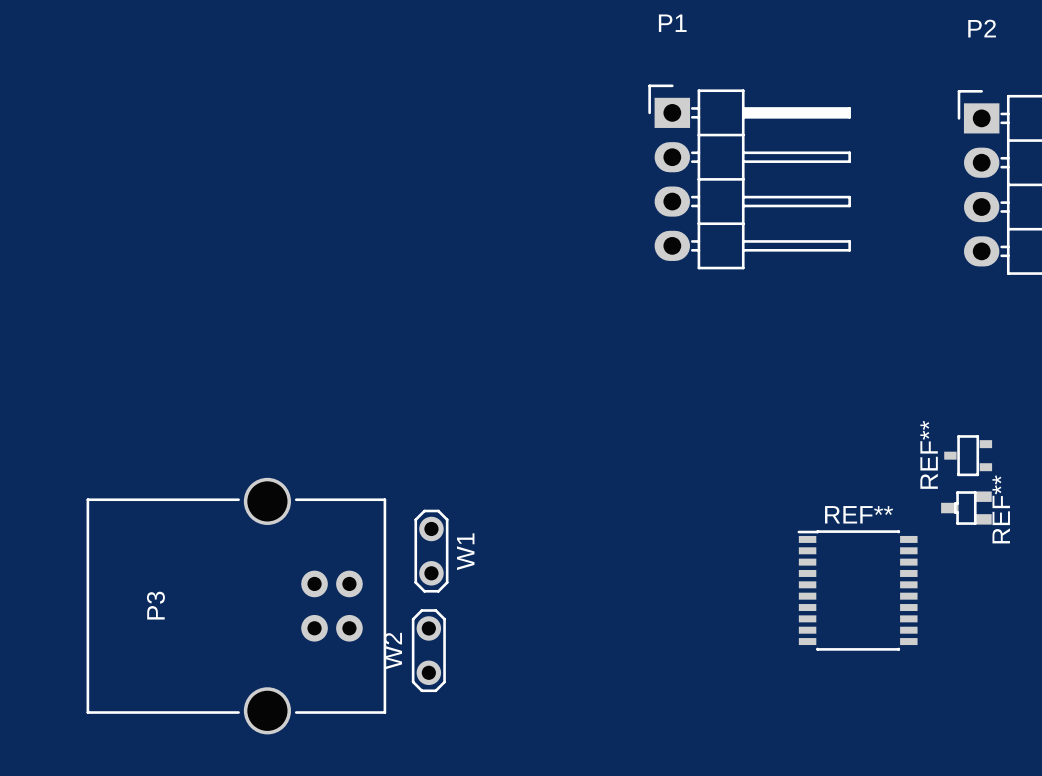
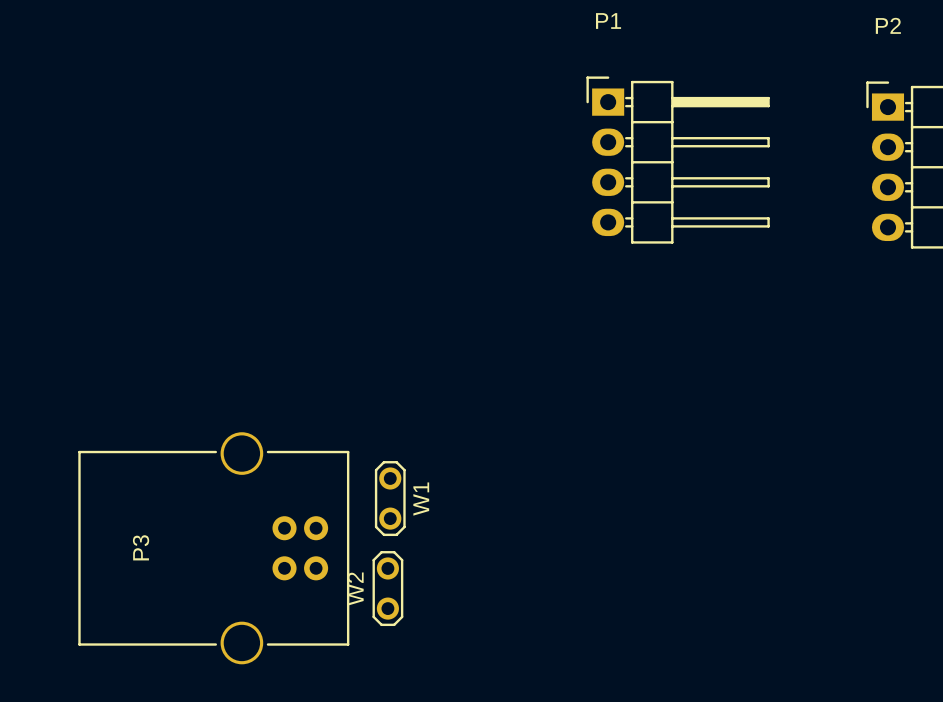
REF**: (968, 455) -> none
REF**: (966, 508) -> none
REF**: (857, 590) -> none

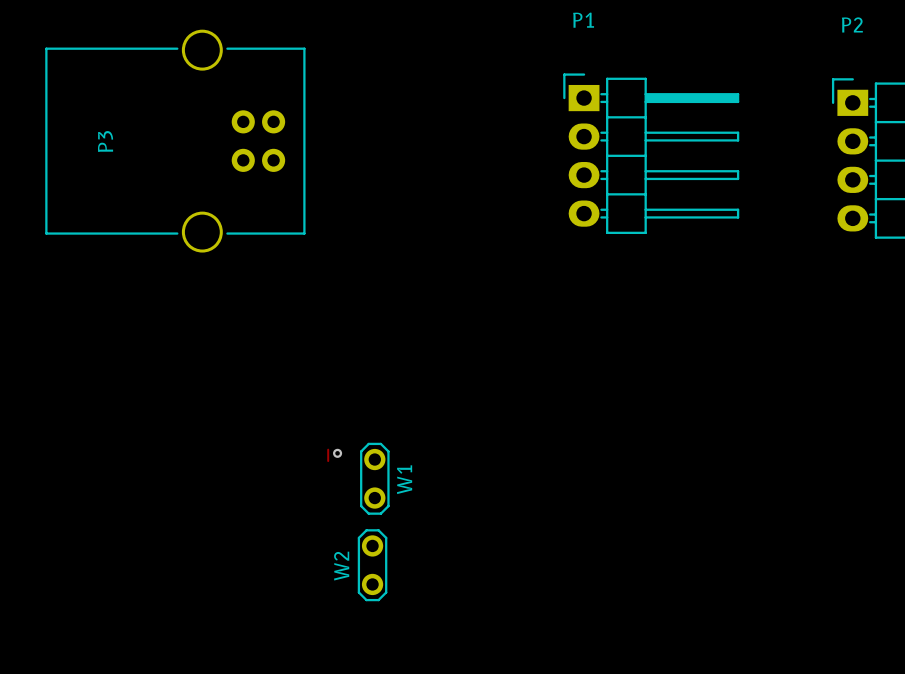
track: none -> (328, 449) (328, 461)
via: none -> (337, 453)
P3 position: (213, 548) -> (175, 141)

